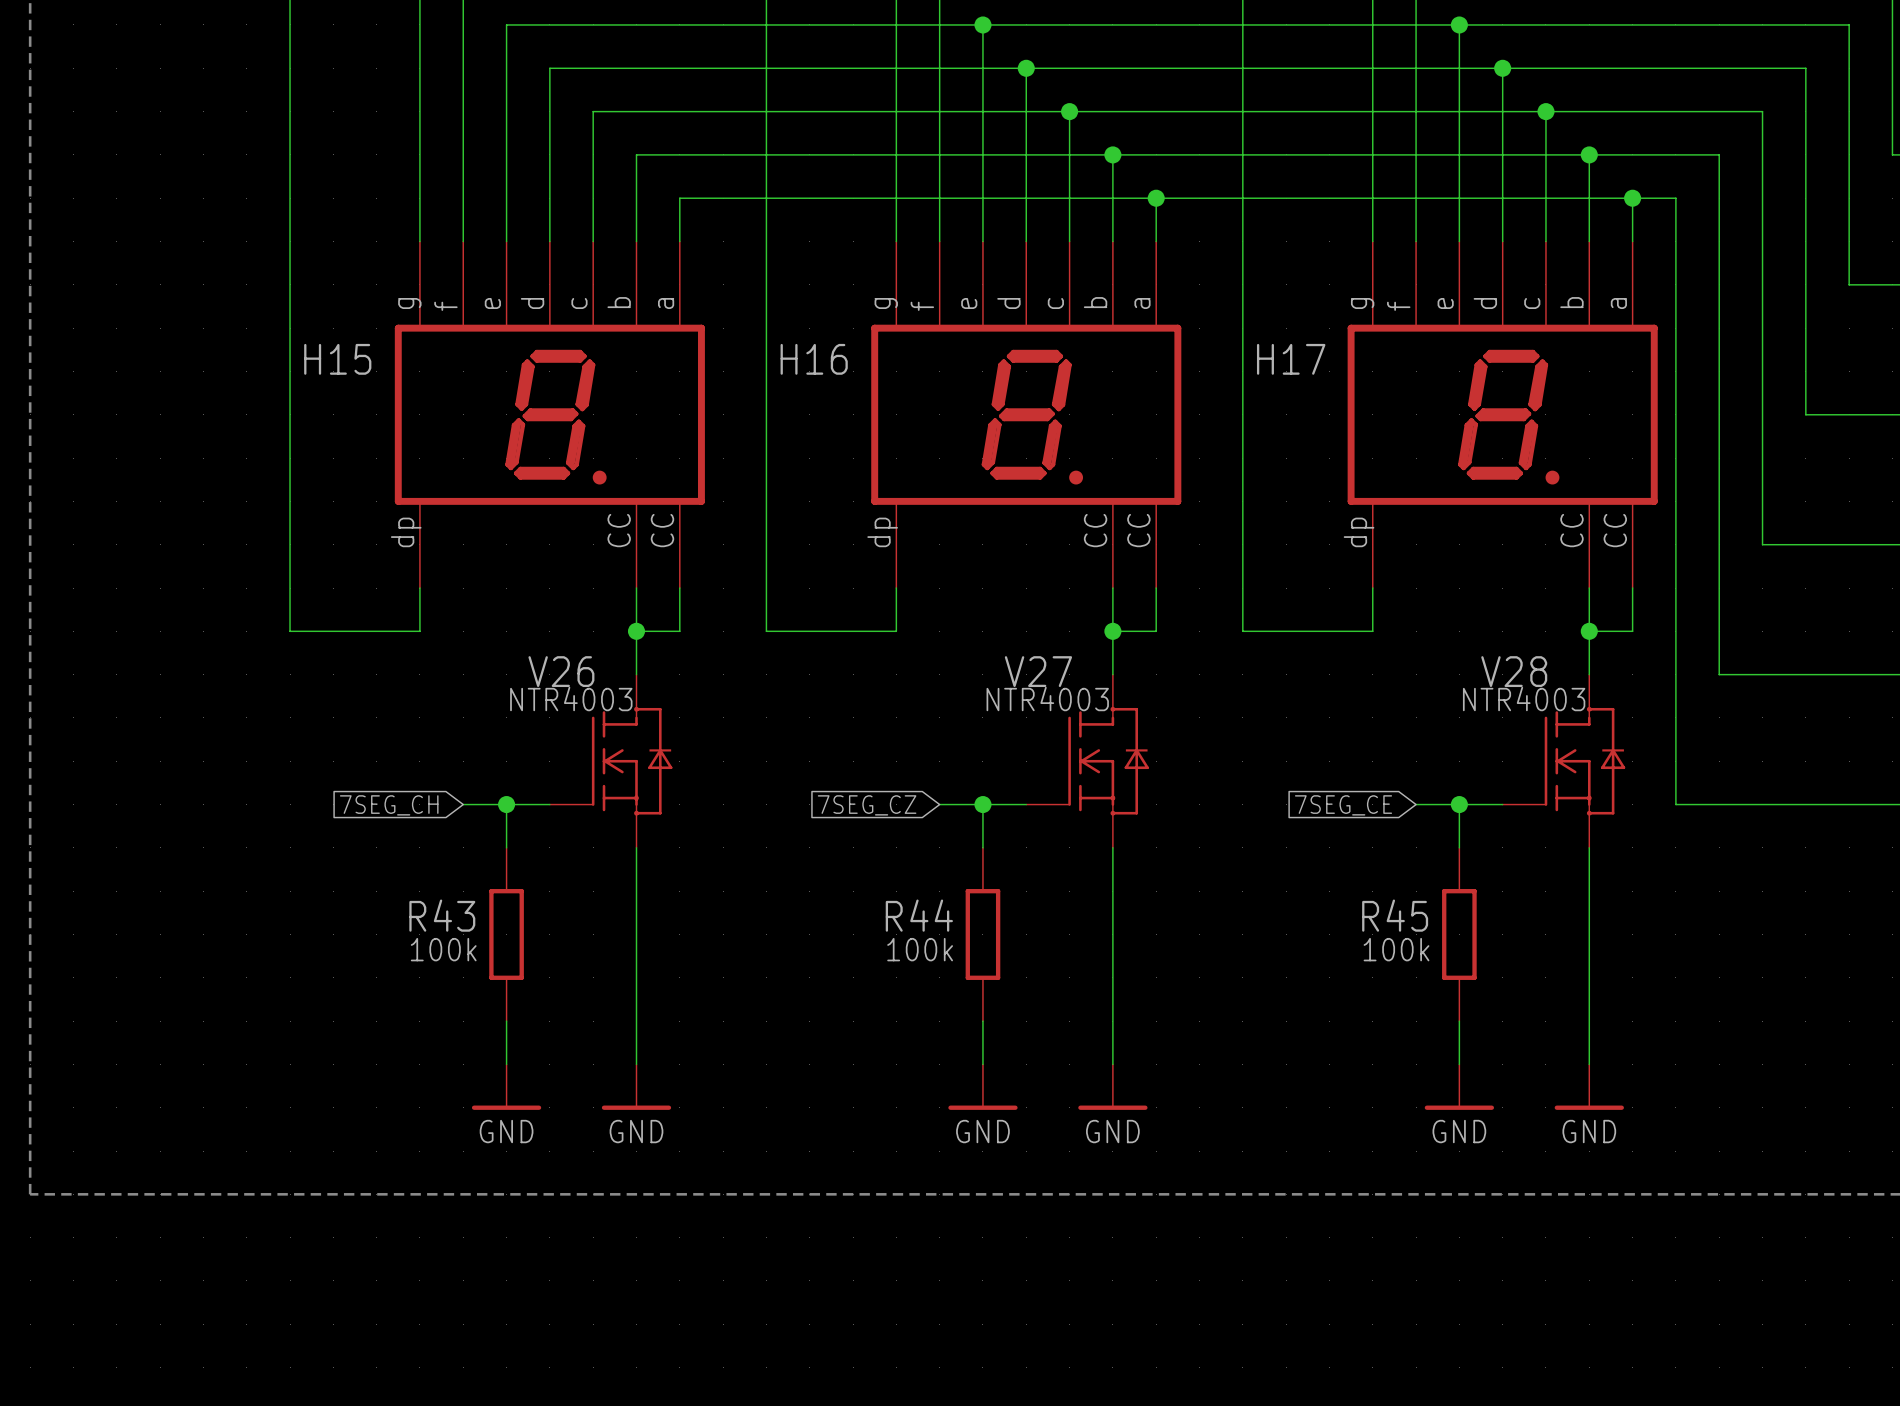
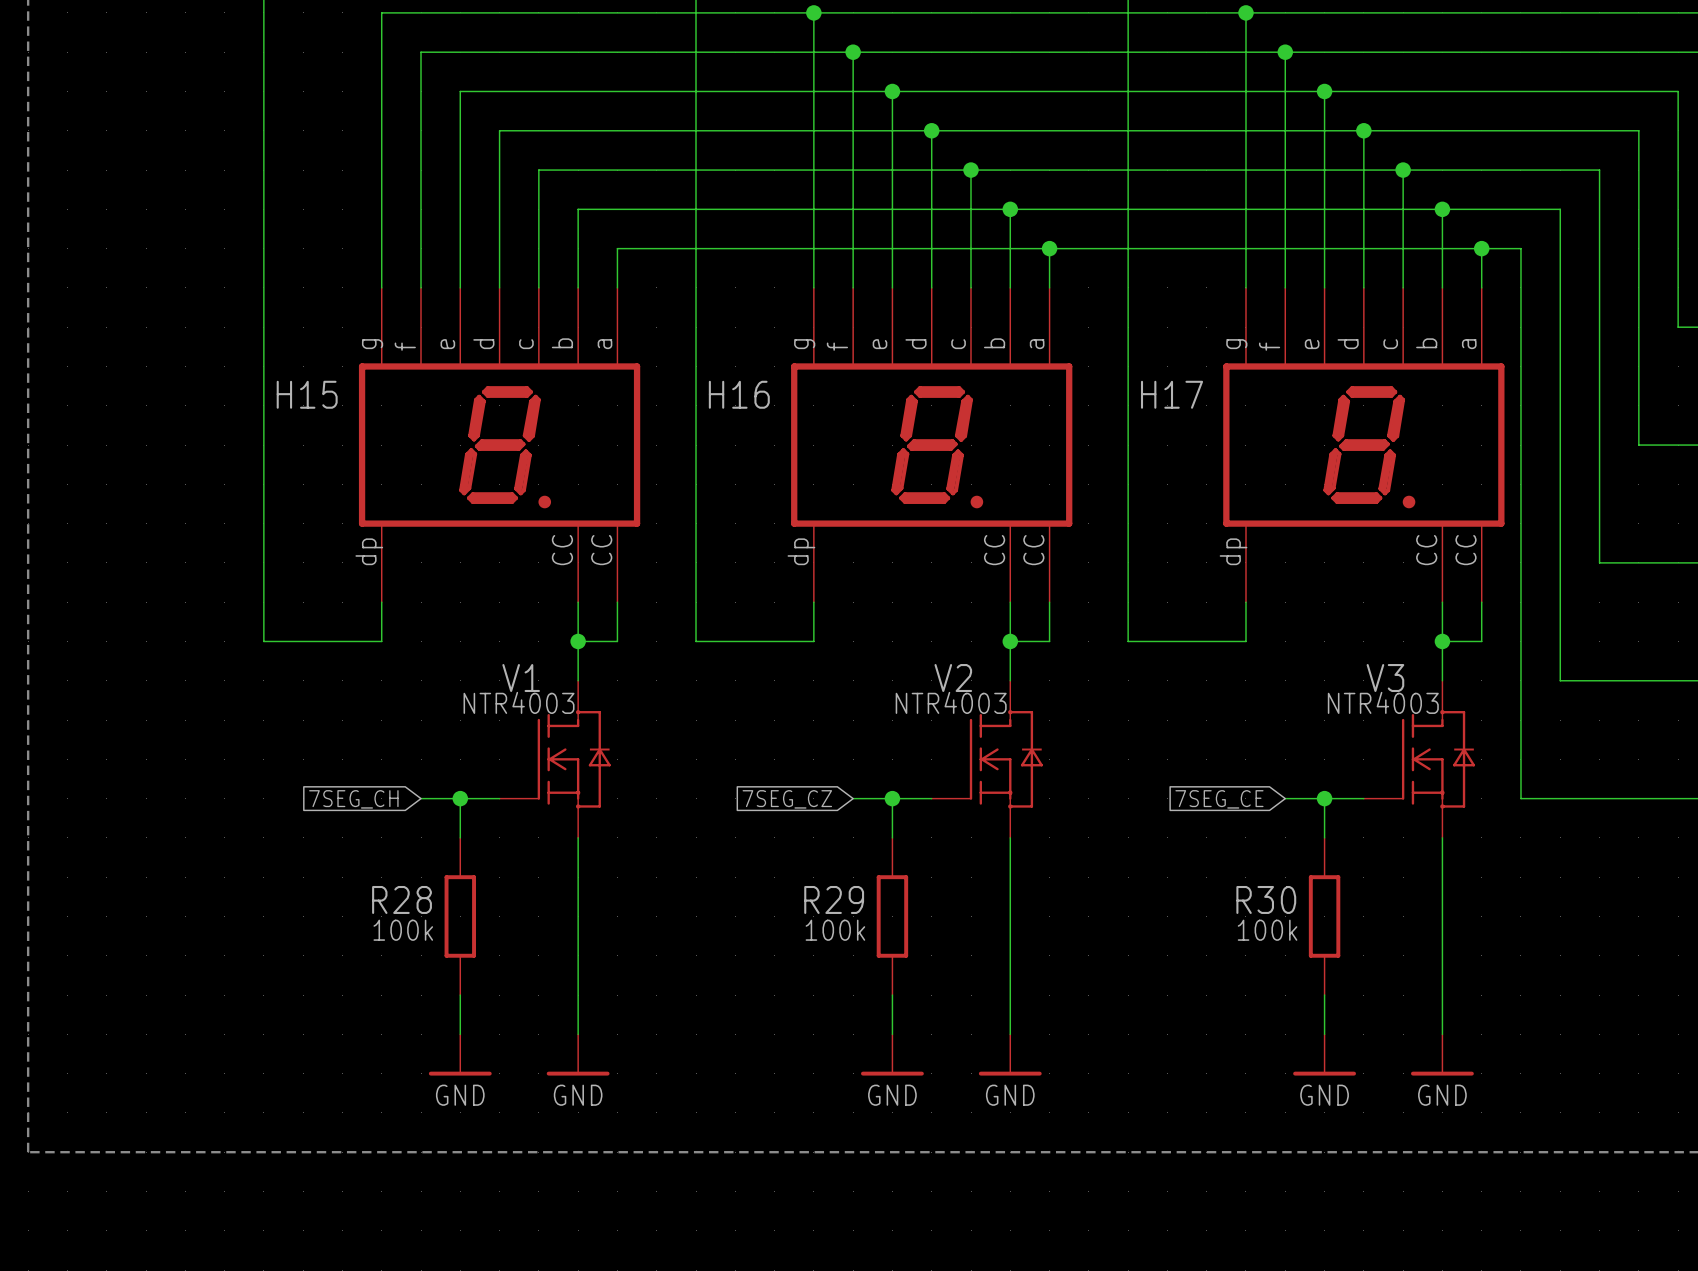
V26 name: V26 (561, 671) -> V1 (521, 678)
V27 name: V27 (1038, 671) -> V2 (953, 678)
V28 name: V28 (1514, 671) -> V3 (1385, 678)
R43 name: R43 (442, 915) -> R28 (402, 899)
R44 name: R44 (919, 915) -> R29 (834, 899)
R45 name: R45 (1395, 915) -> R30 (1266, 899)

